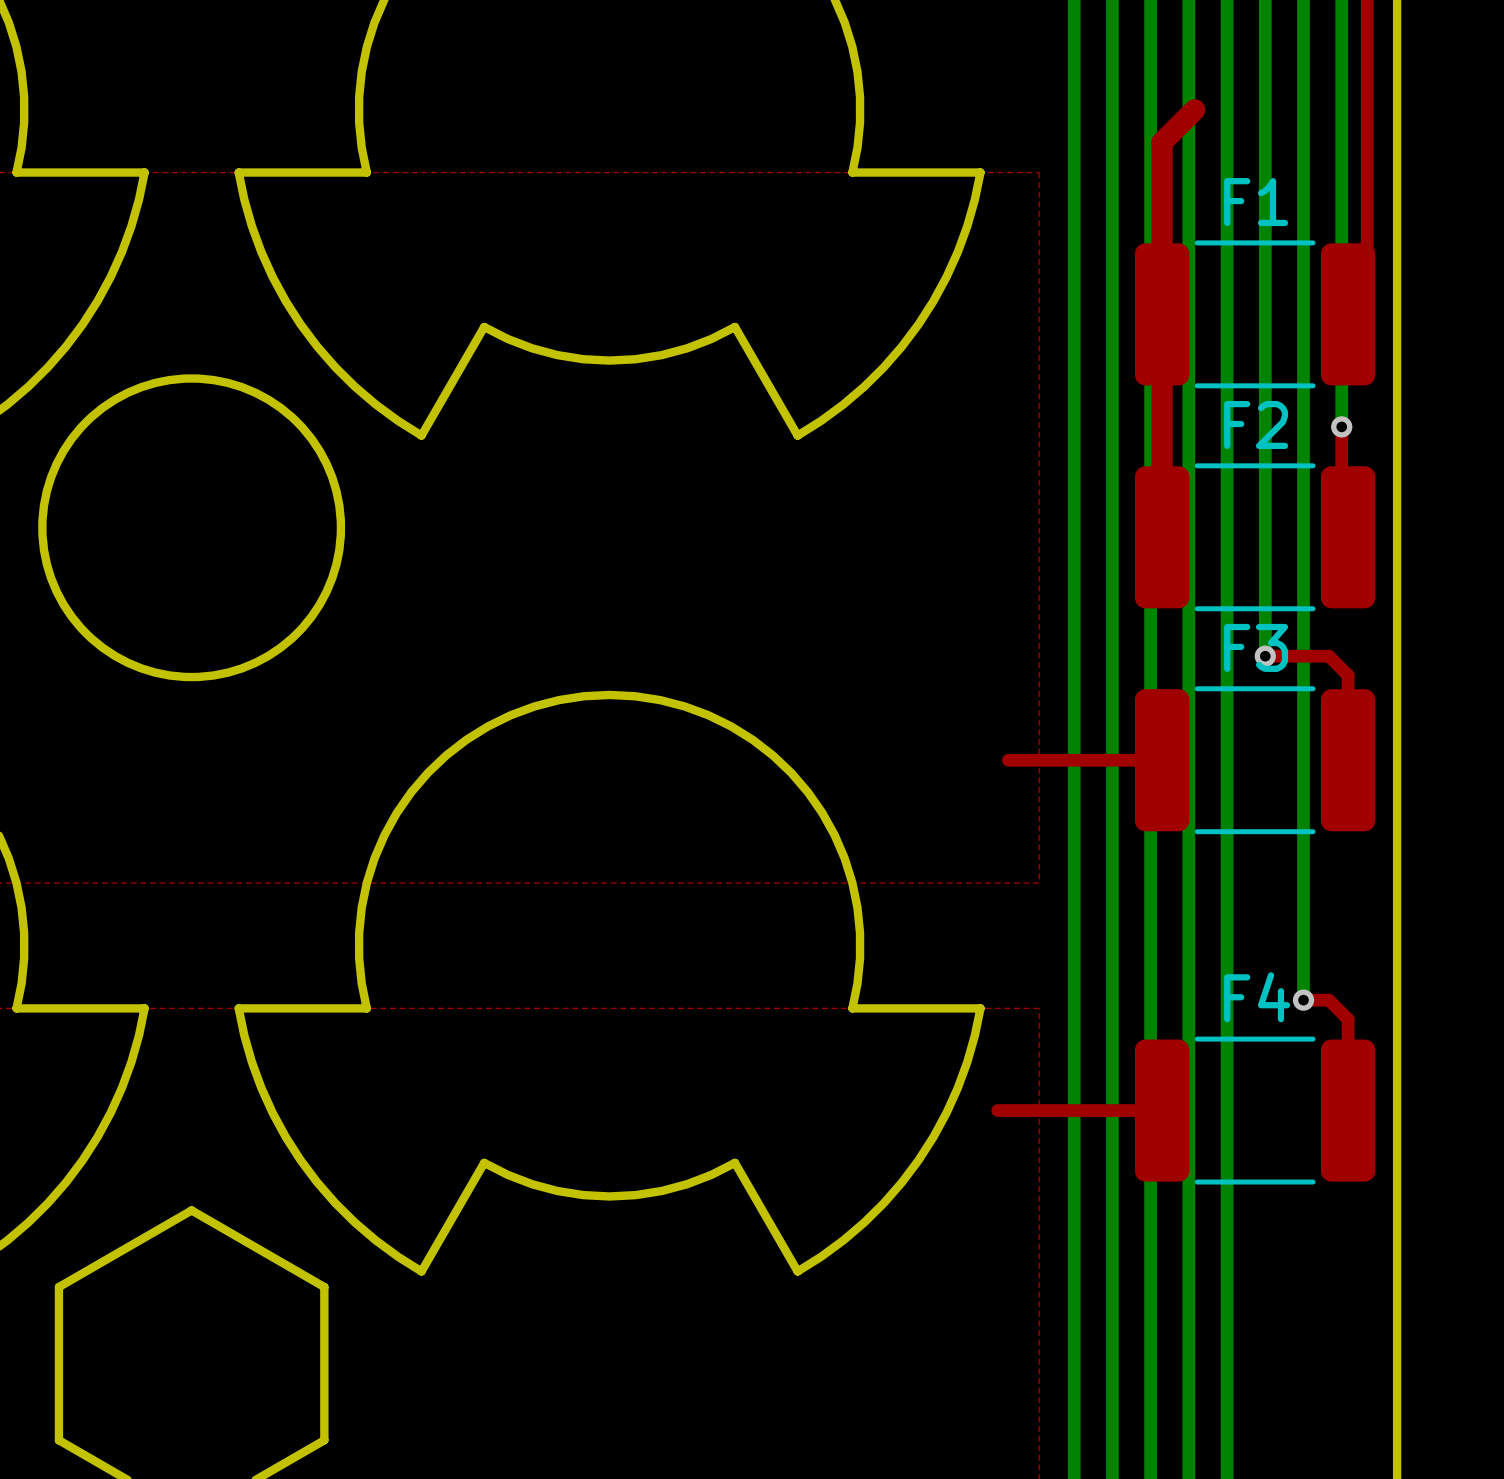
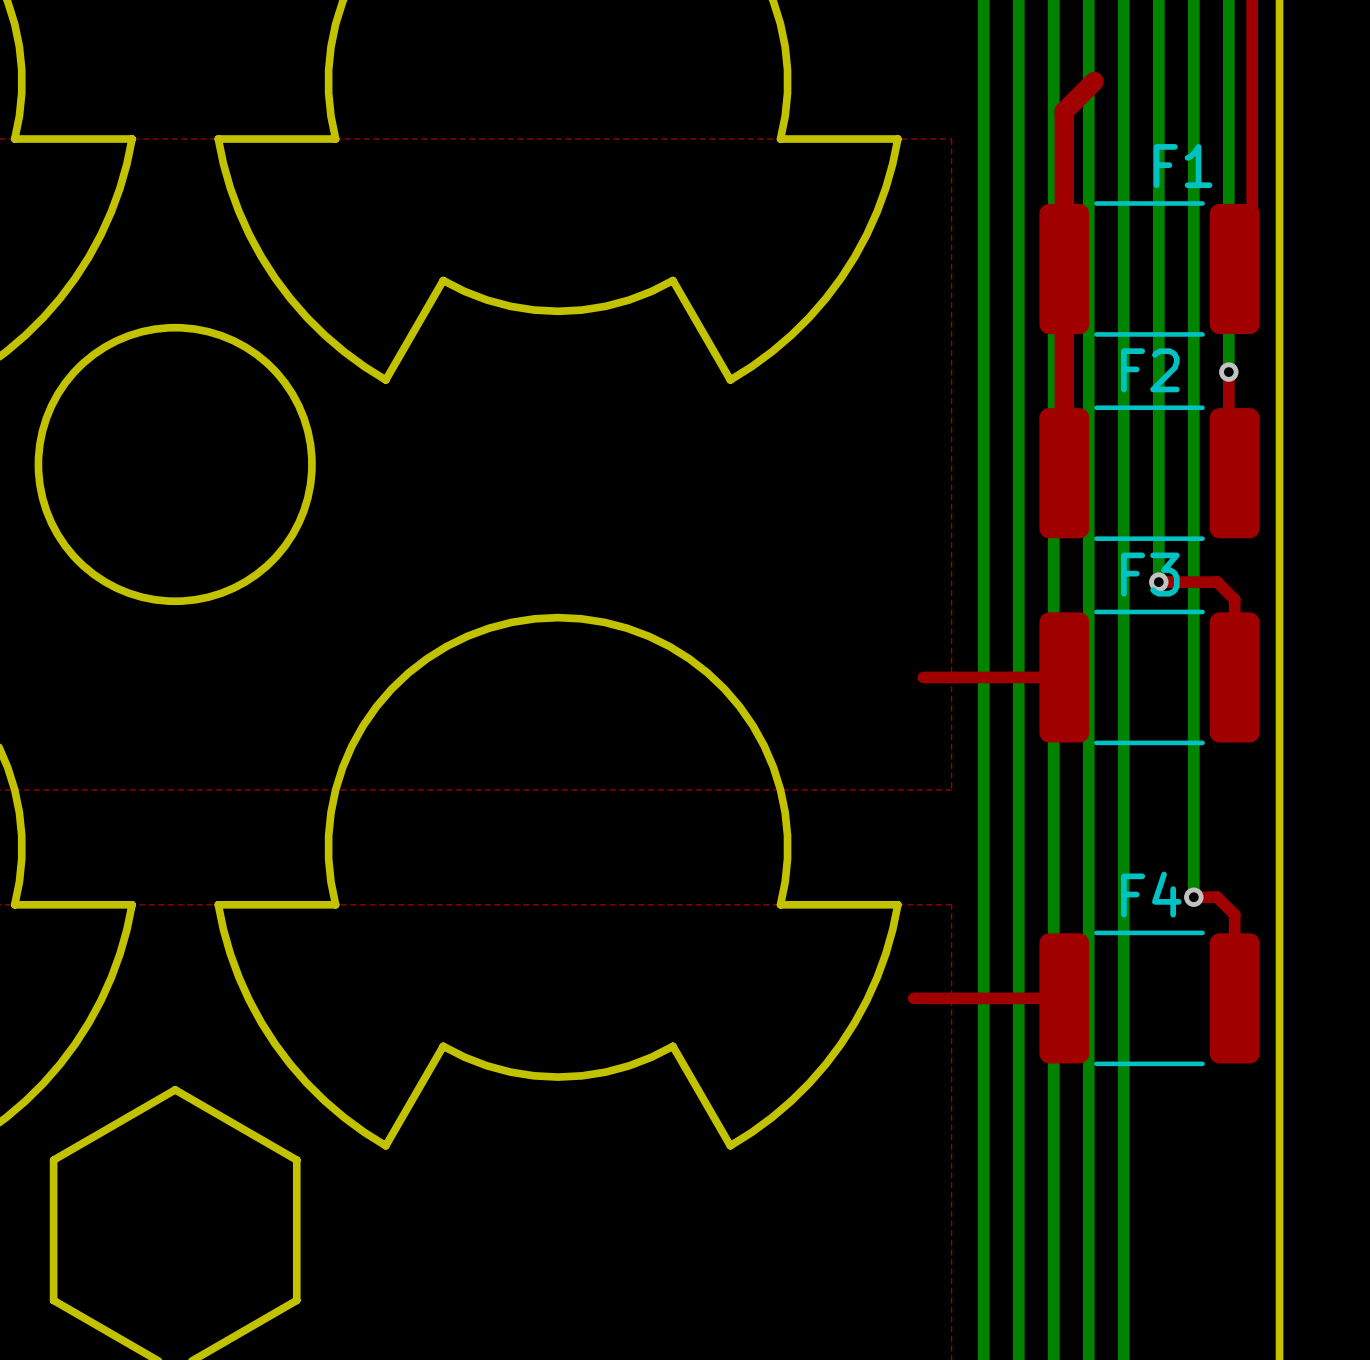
F1 name position: F1 (1256, 202) -> F1 (1183, 166)

